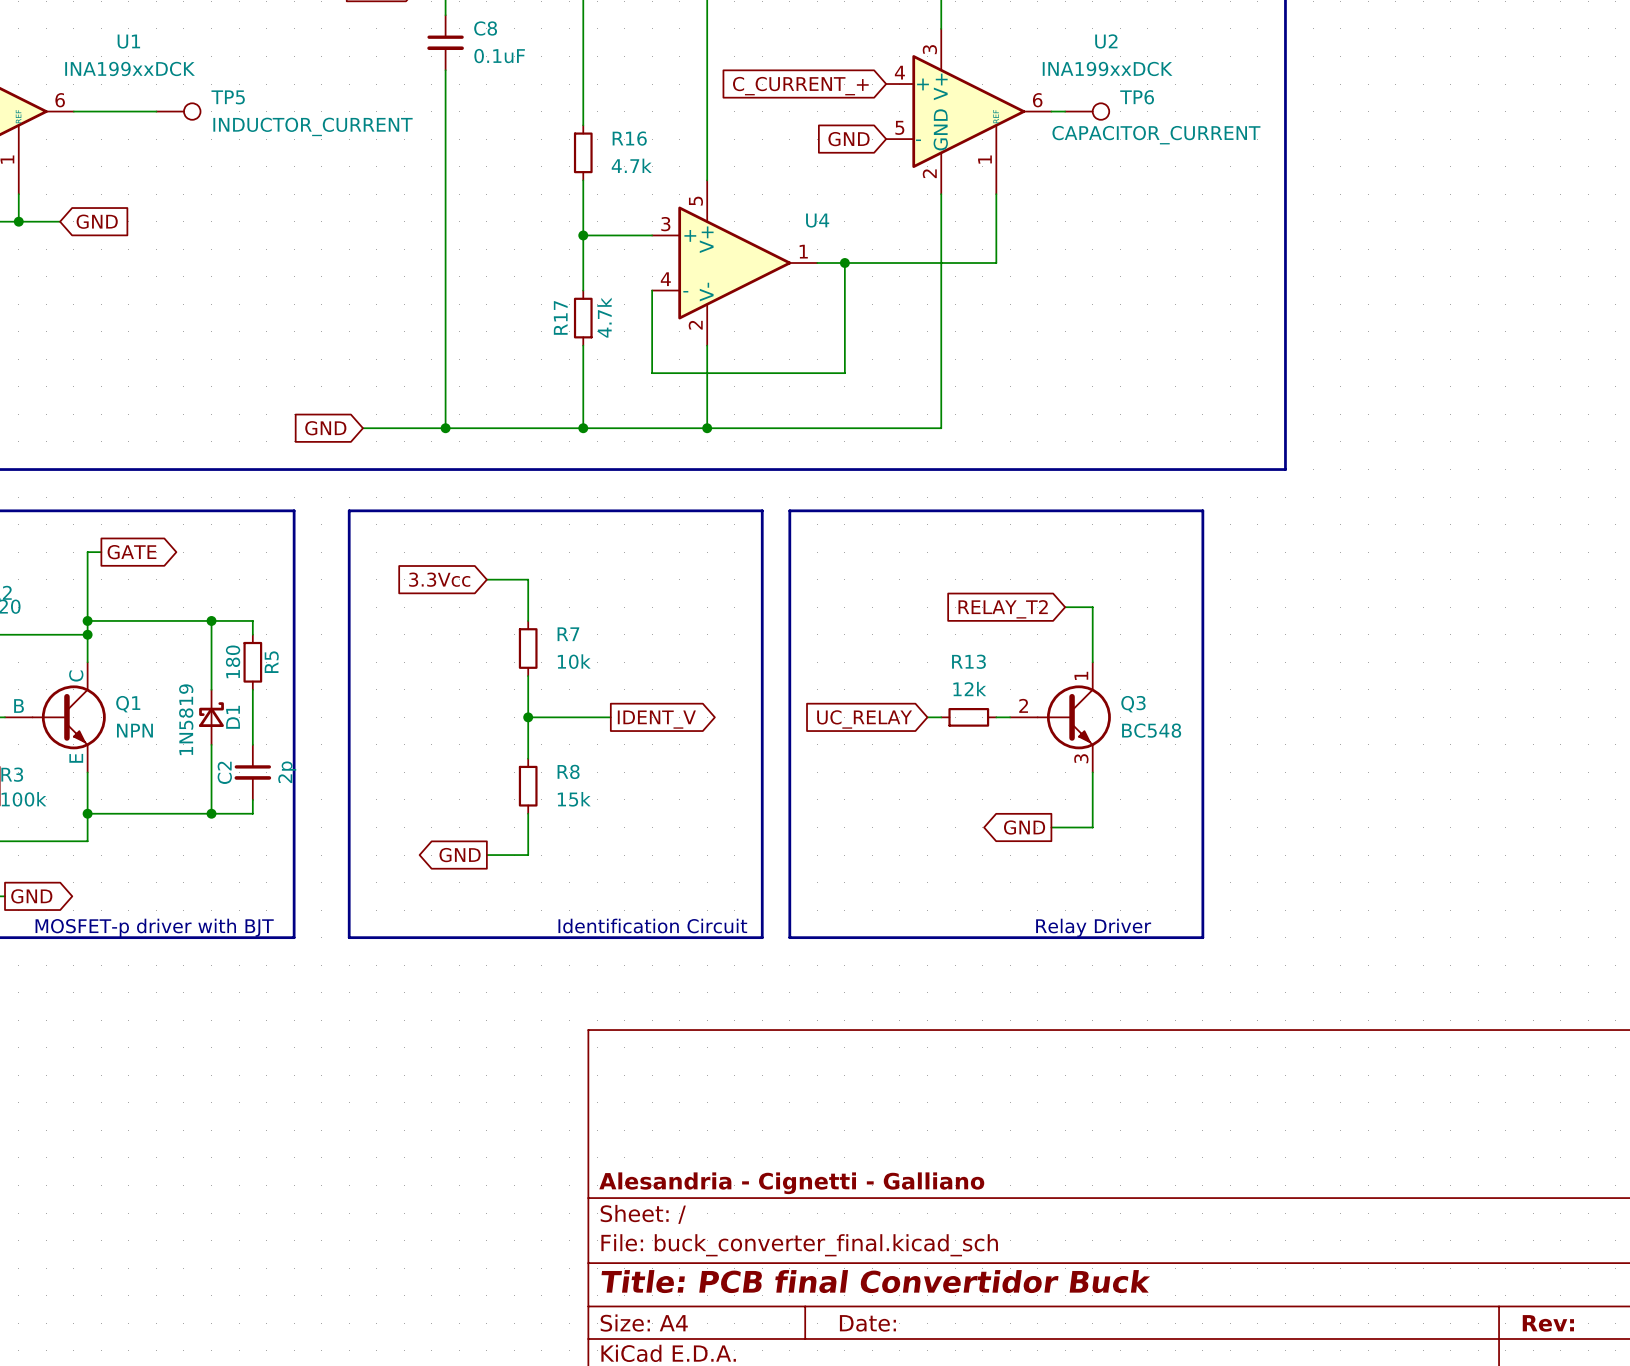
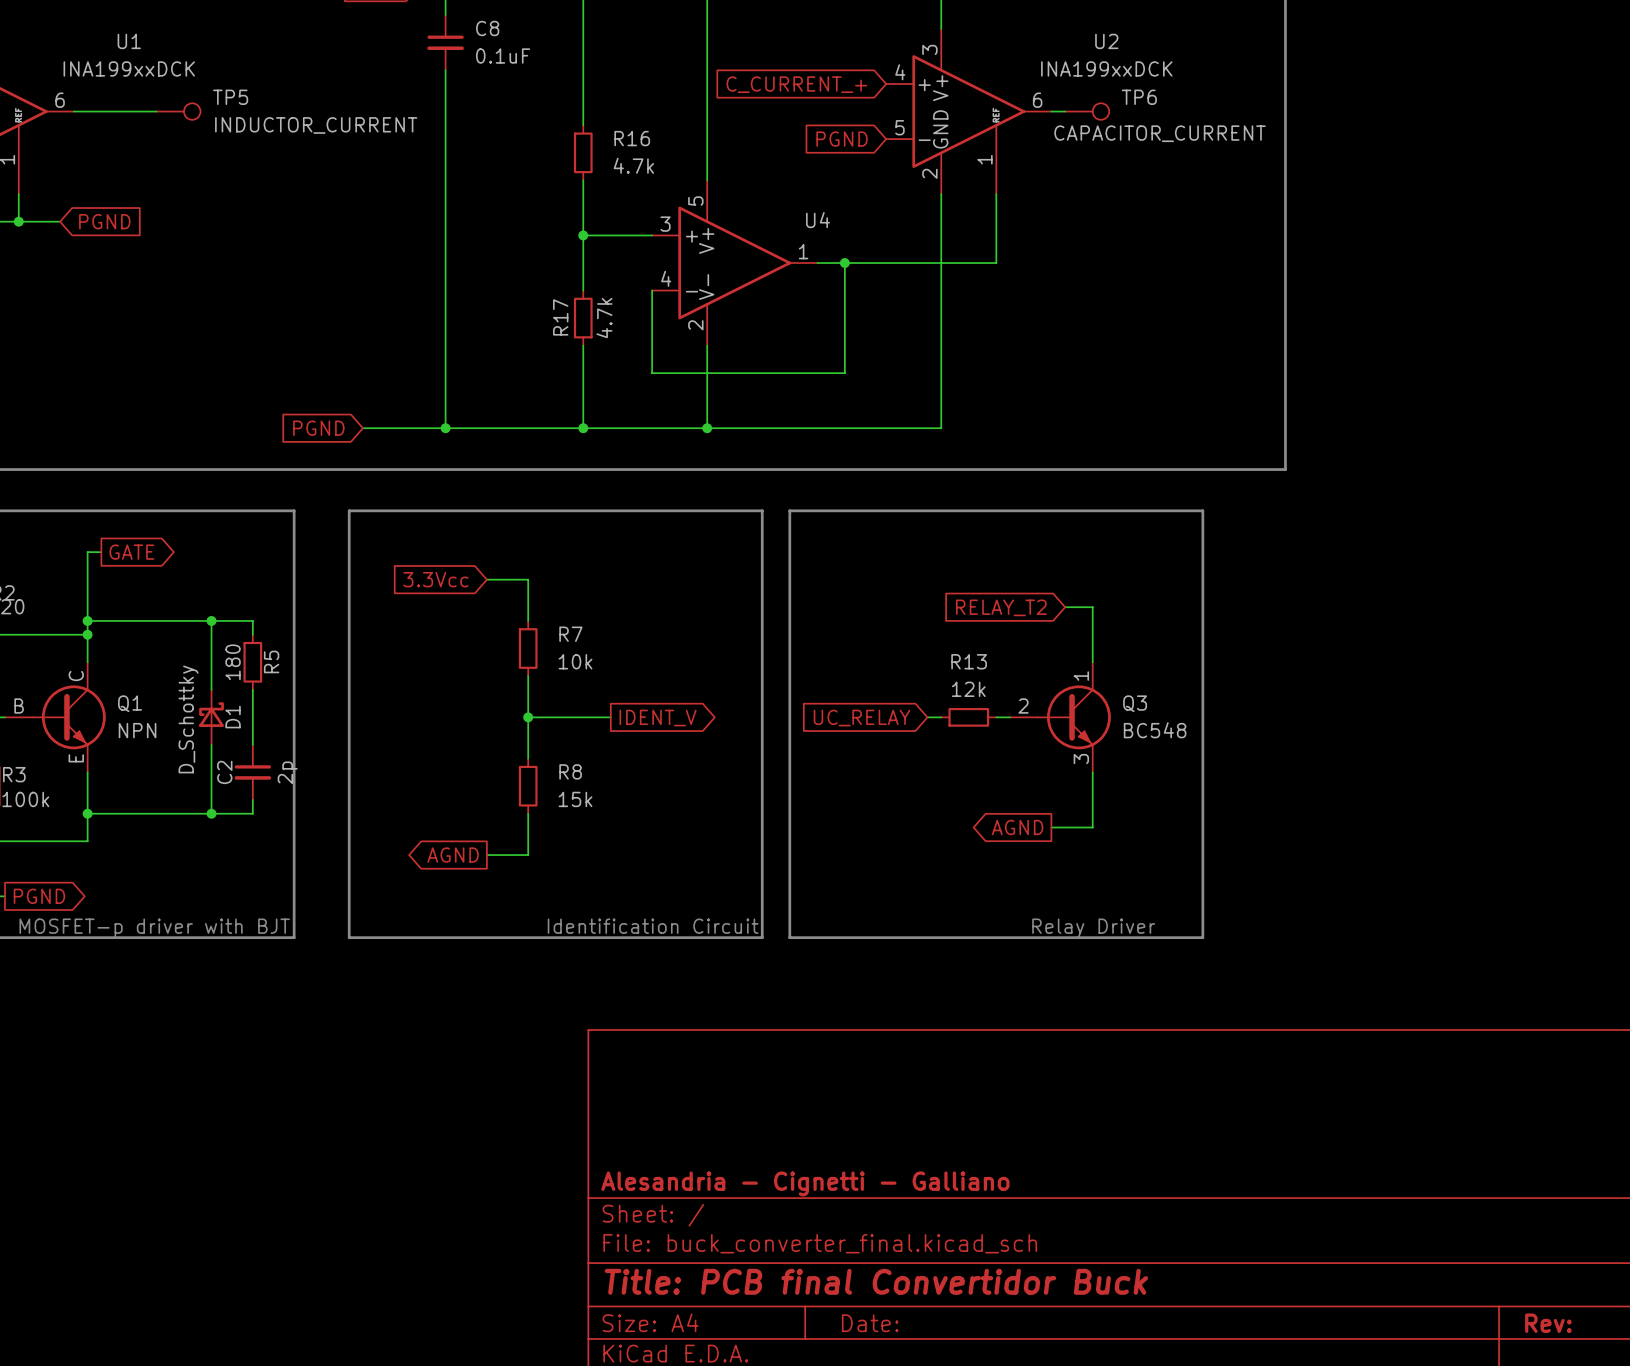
global label: GND (849, 139) -> PGND (842, 139)
global label: GND (97, 221) -> PGND (104, 221)
global label: GND (325, 428) -> PGND (318, 428)
D1 value: 1N5819 (186, 719) -> D_Schottky (188, 719)
global label: GND (1024, 827) -> AGND (1017, 827)
global label: GND (460, 855) -> AGND (453, 855)
global label: GND (31, 896) -> PGND (39, 896)

